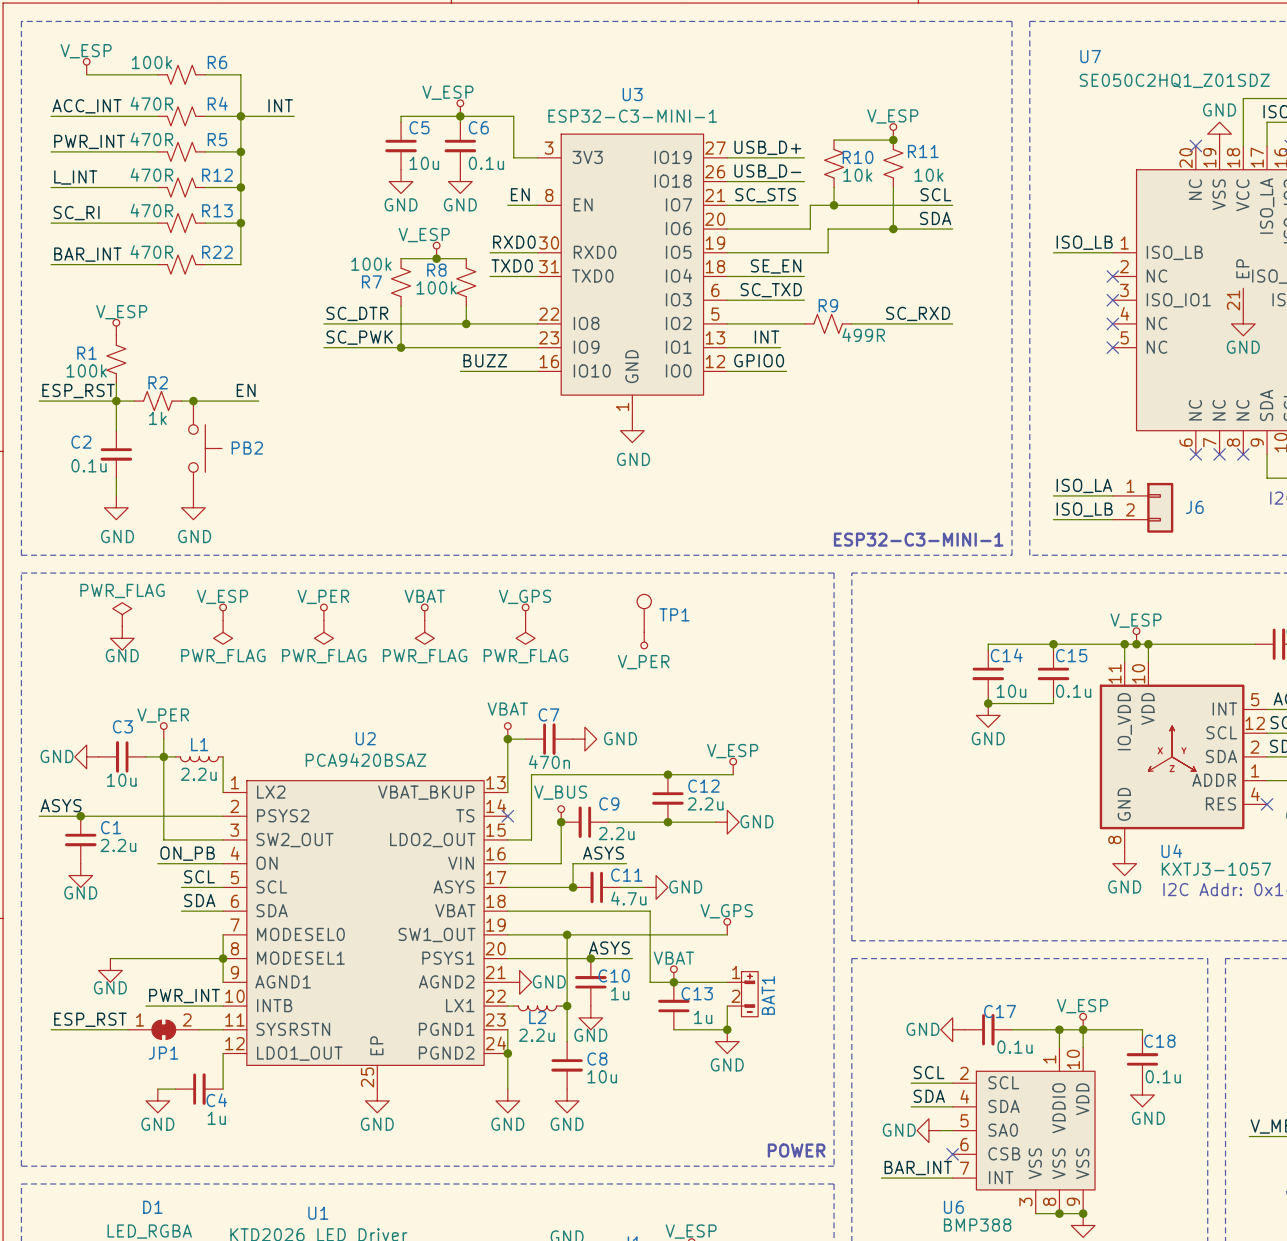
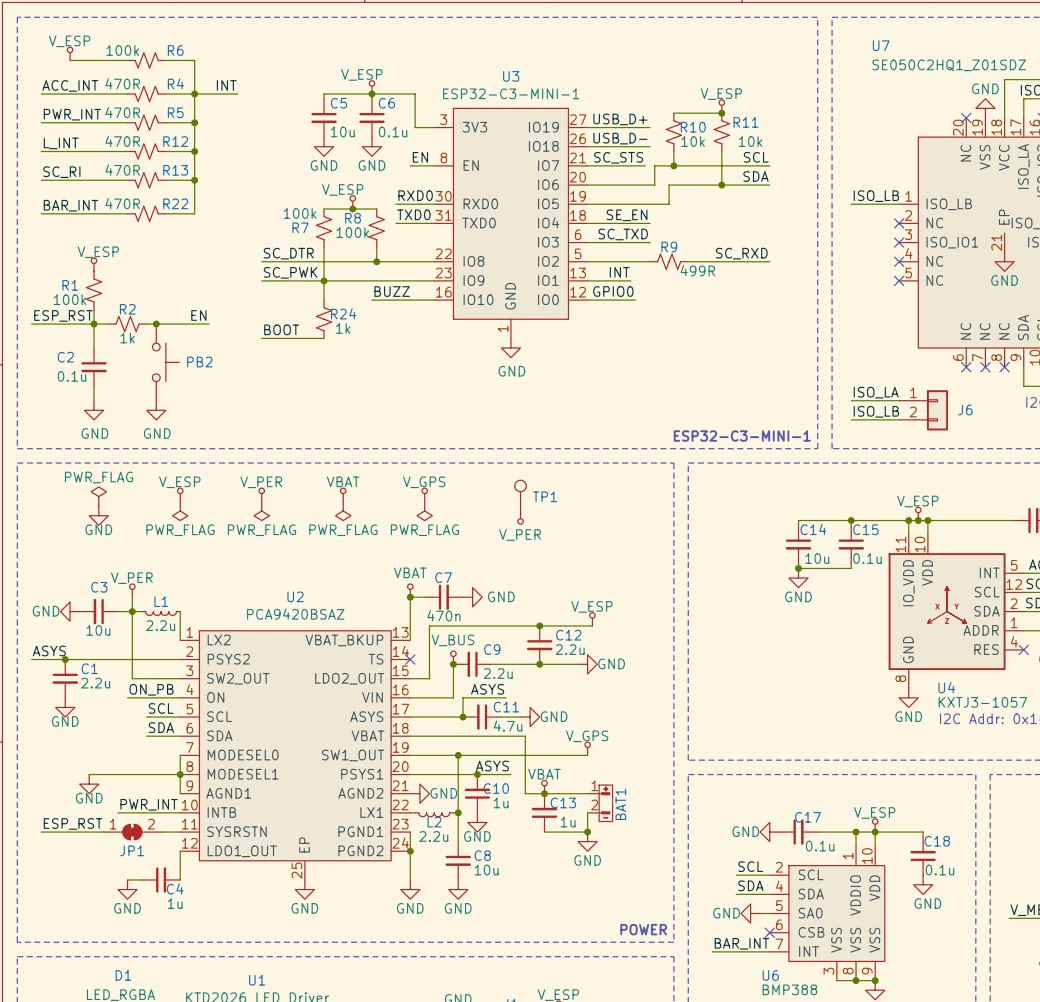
wire: none -> (324, 280) (324, 300)
R24: none -> 1k (324, 319)
label: none -> BOOT (281, 329)
wire: none -> (261, 338) (324, 338)

